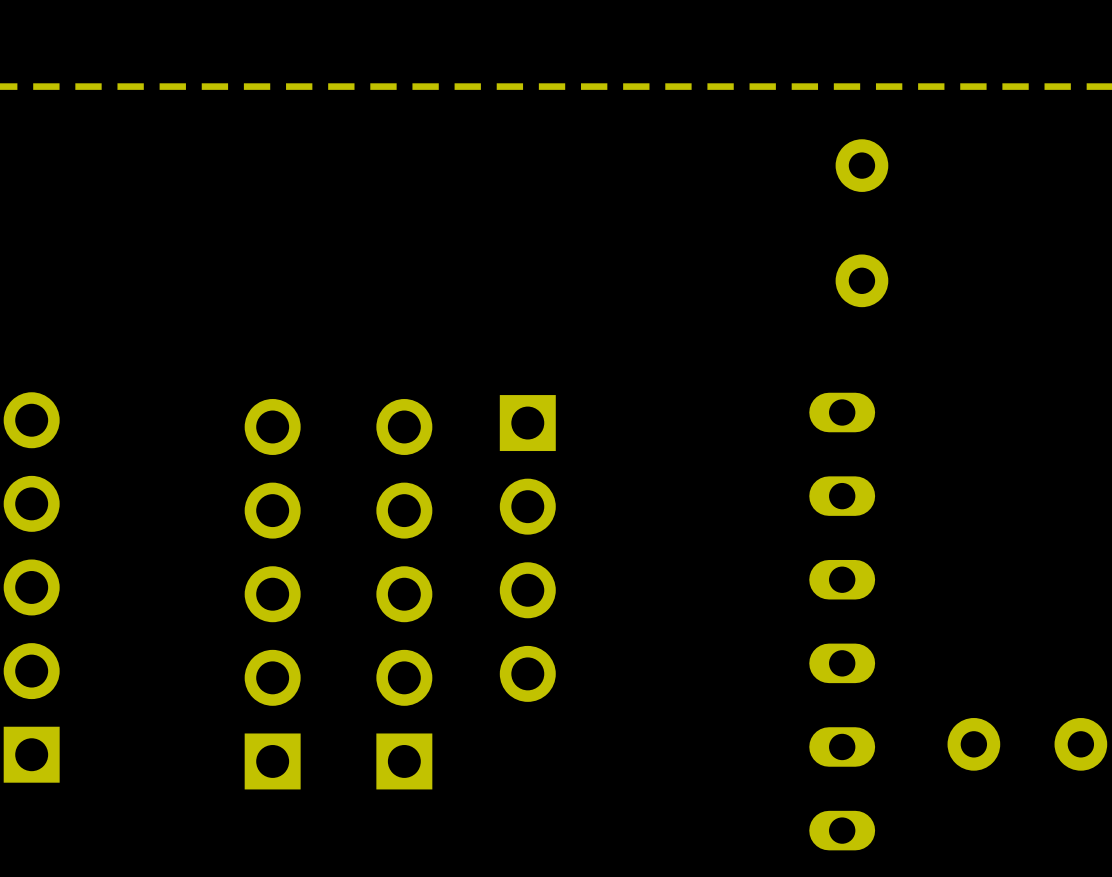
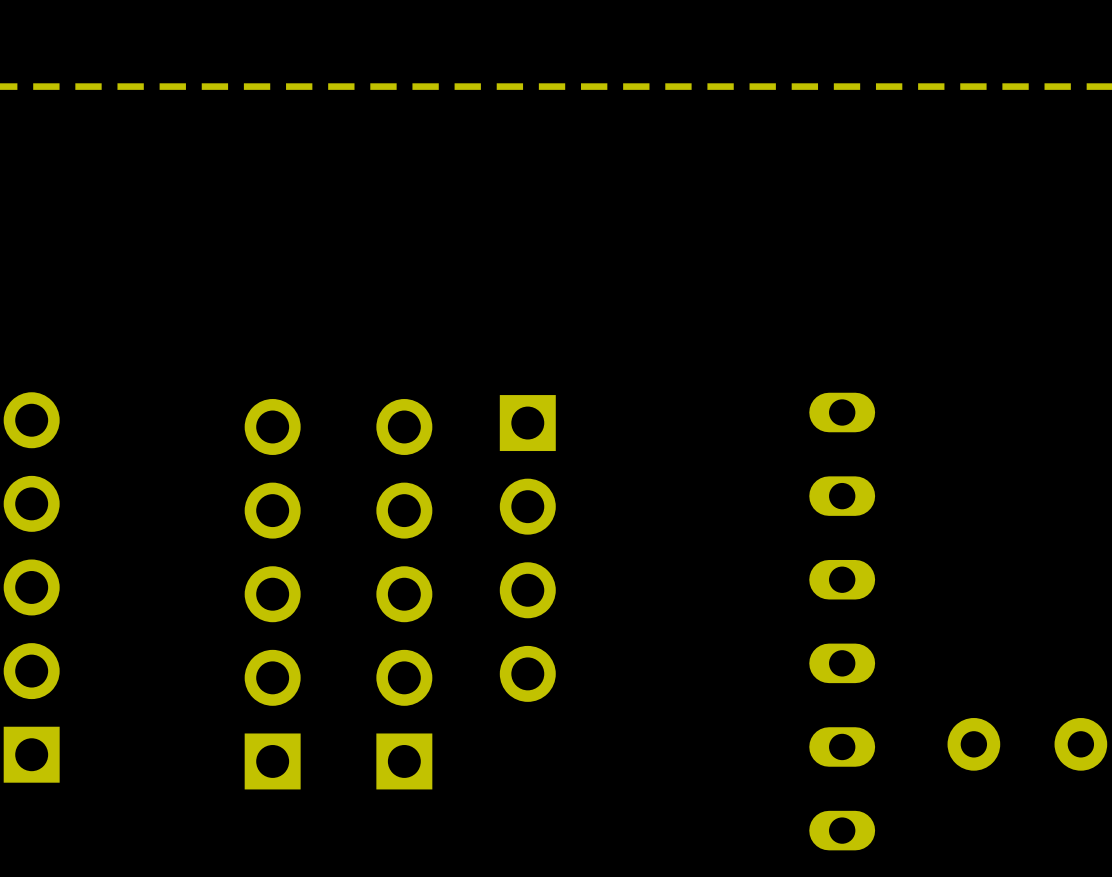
part: (861, 223) -> none

